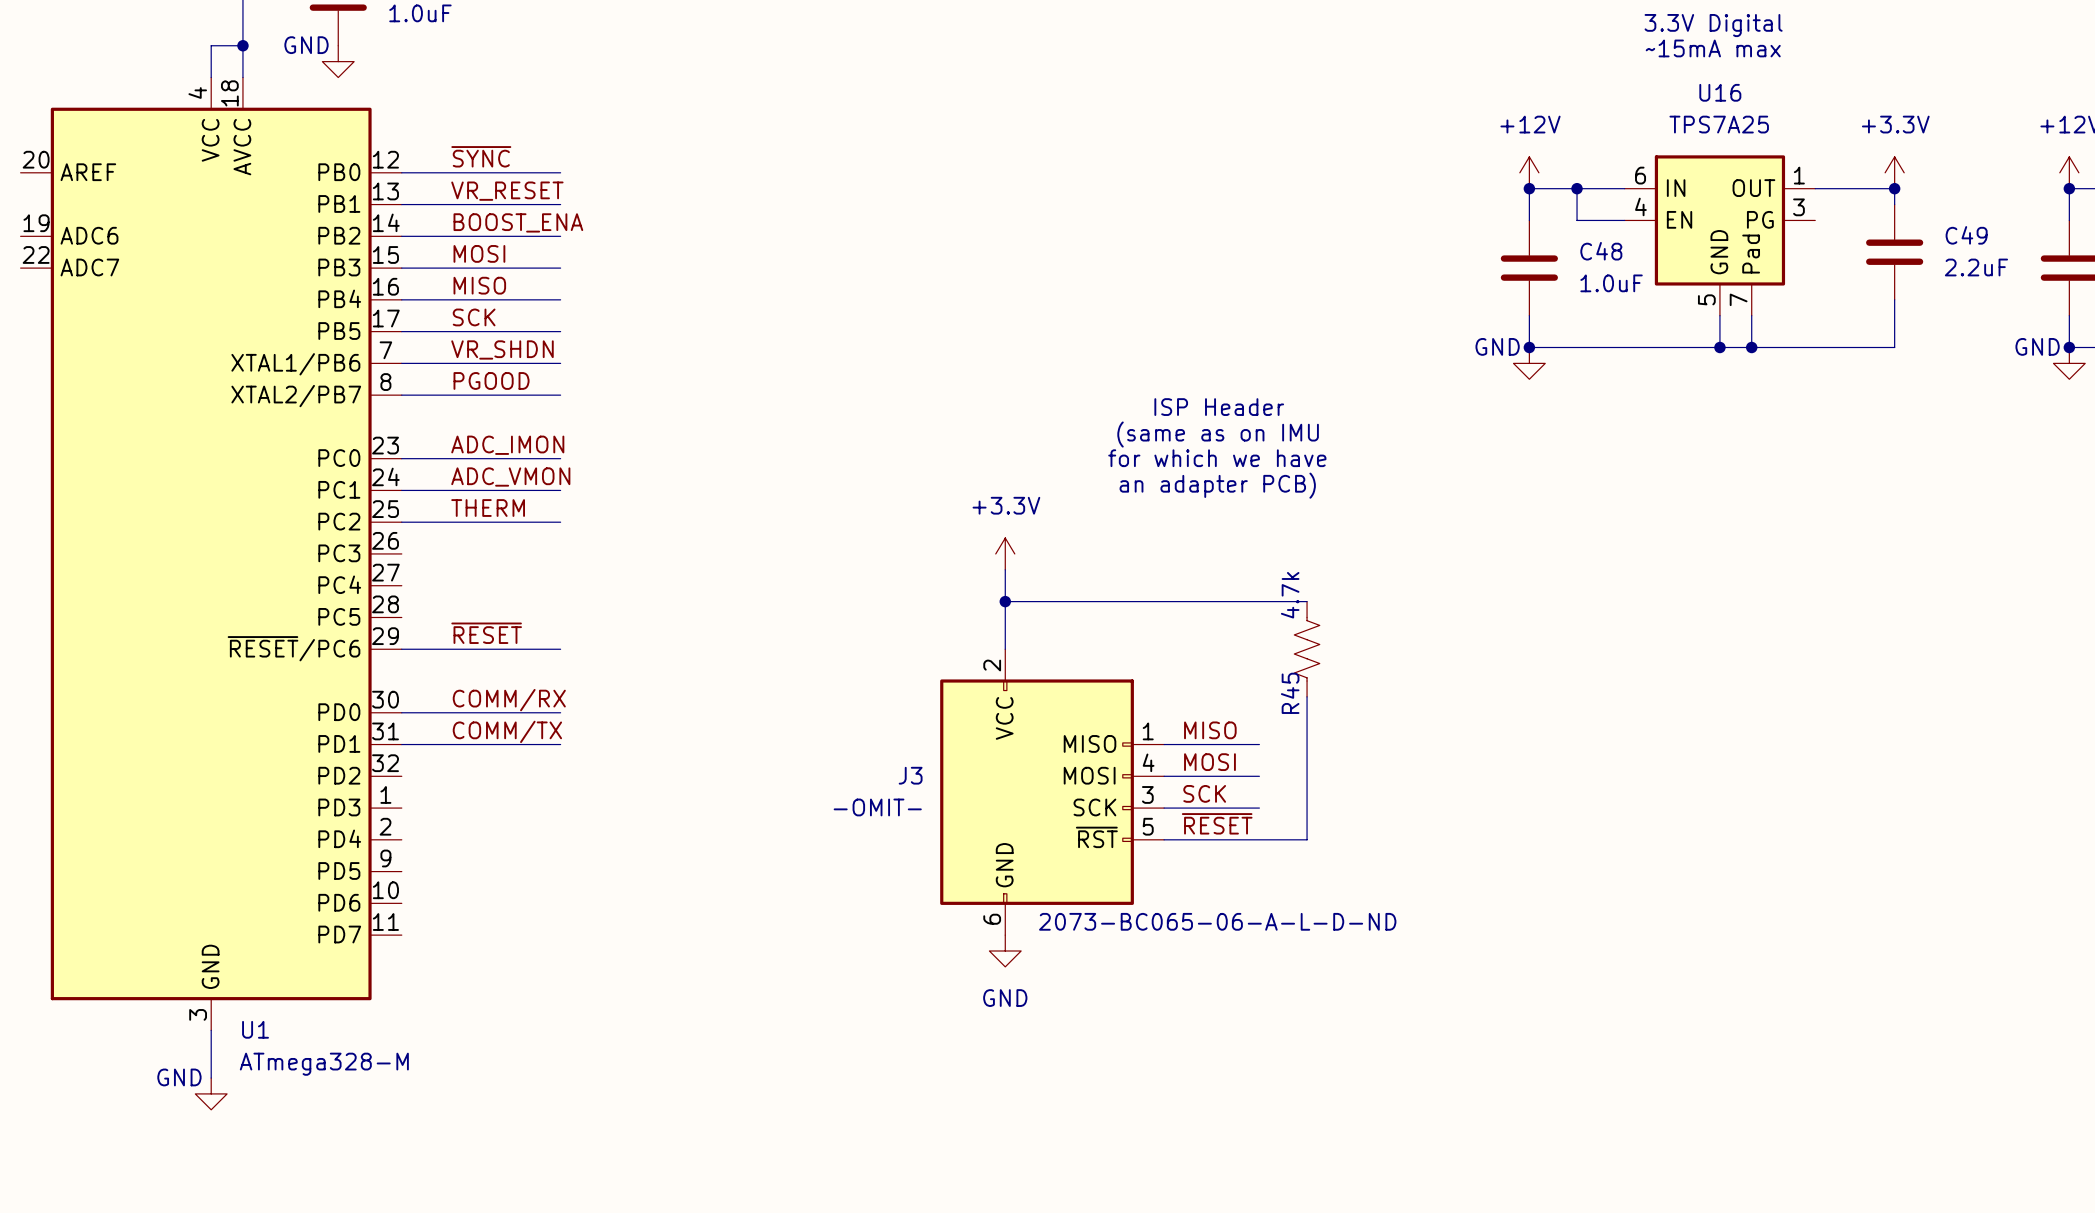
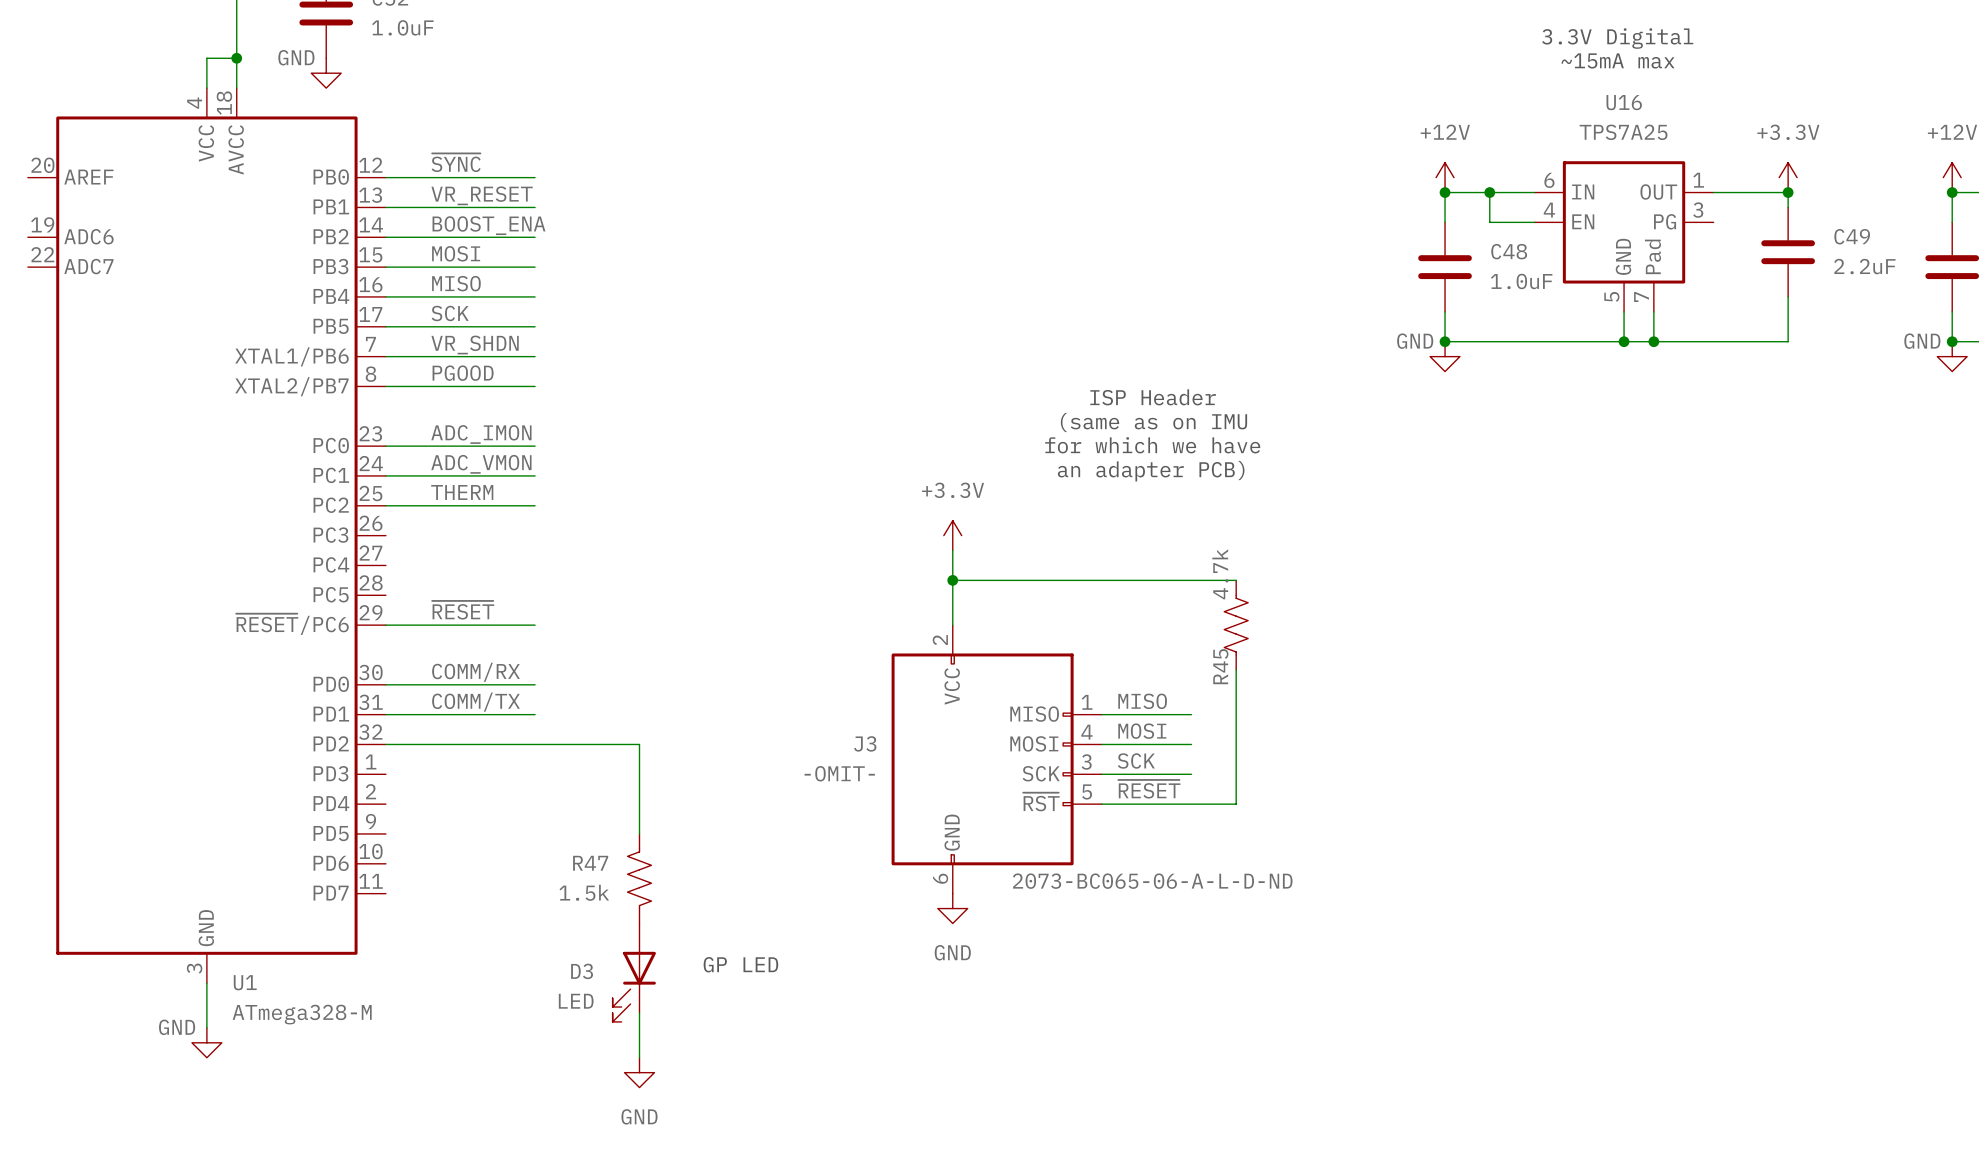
wire: none -> (385, 744) (639, 744) (639, 833)
R47: none -> 1.5k (639, 878)
text: none -> GP LED (740, 964)
D3: none -> LED (634, 972)
wire: none -> (639, 1012) (639, 1057)
power symbol: none -> GND (639, 1072)

